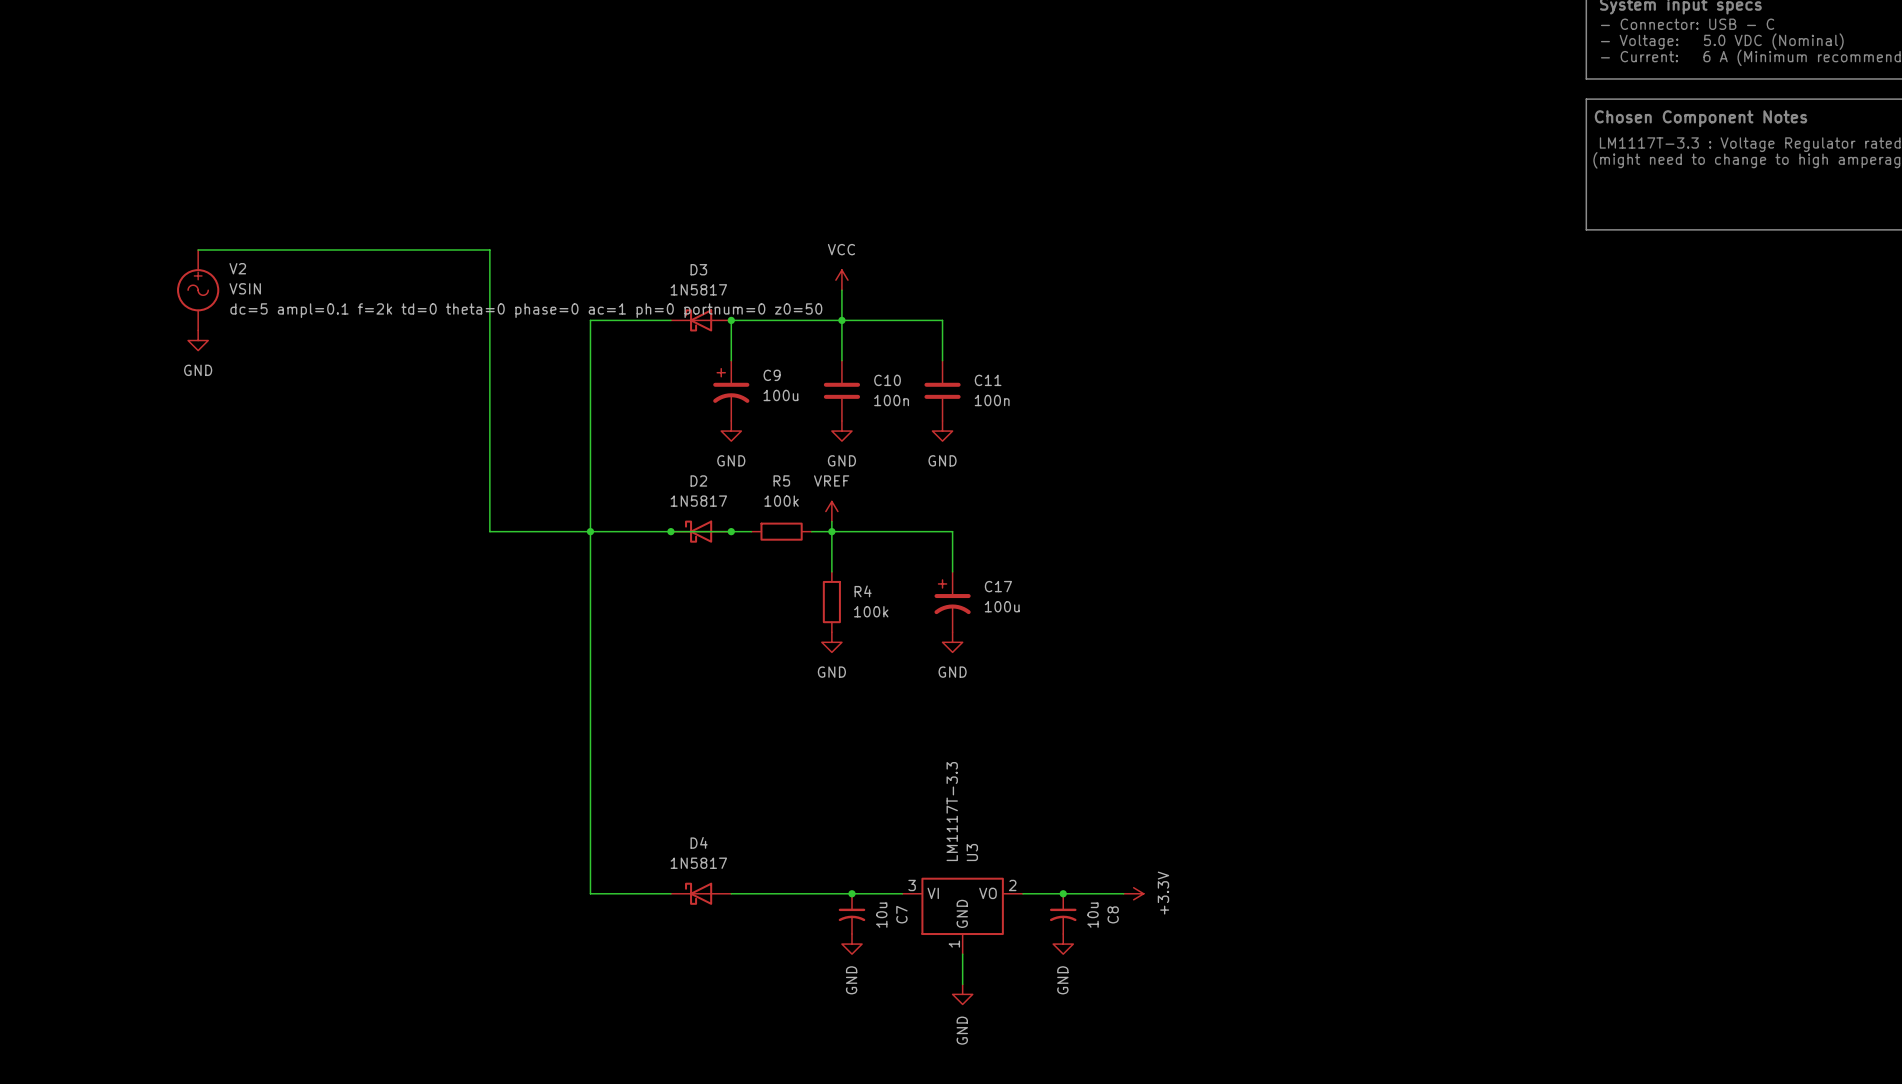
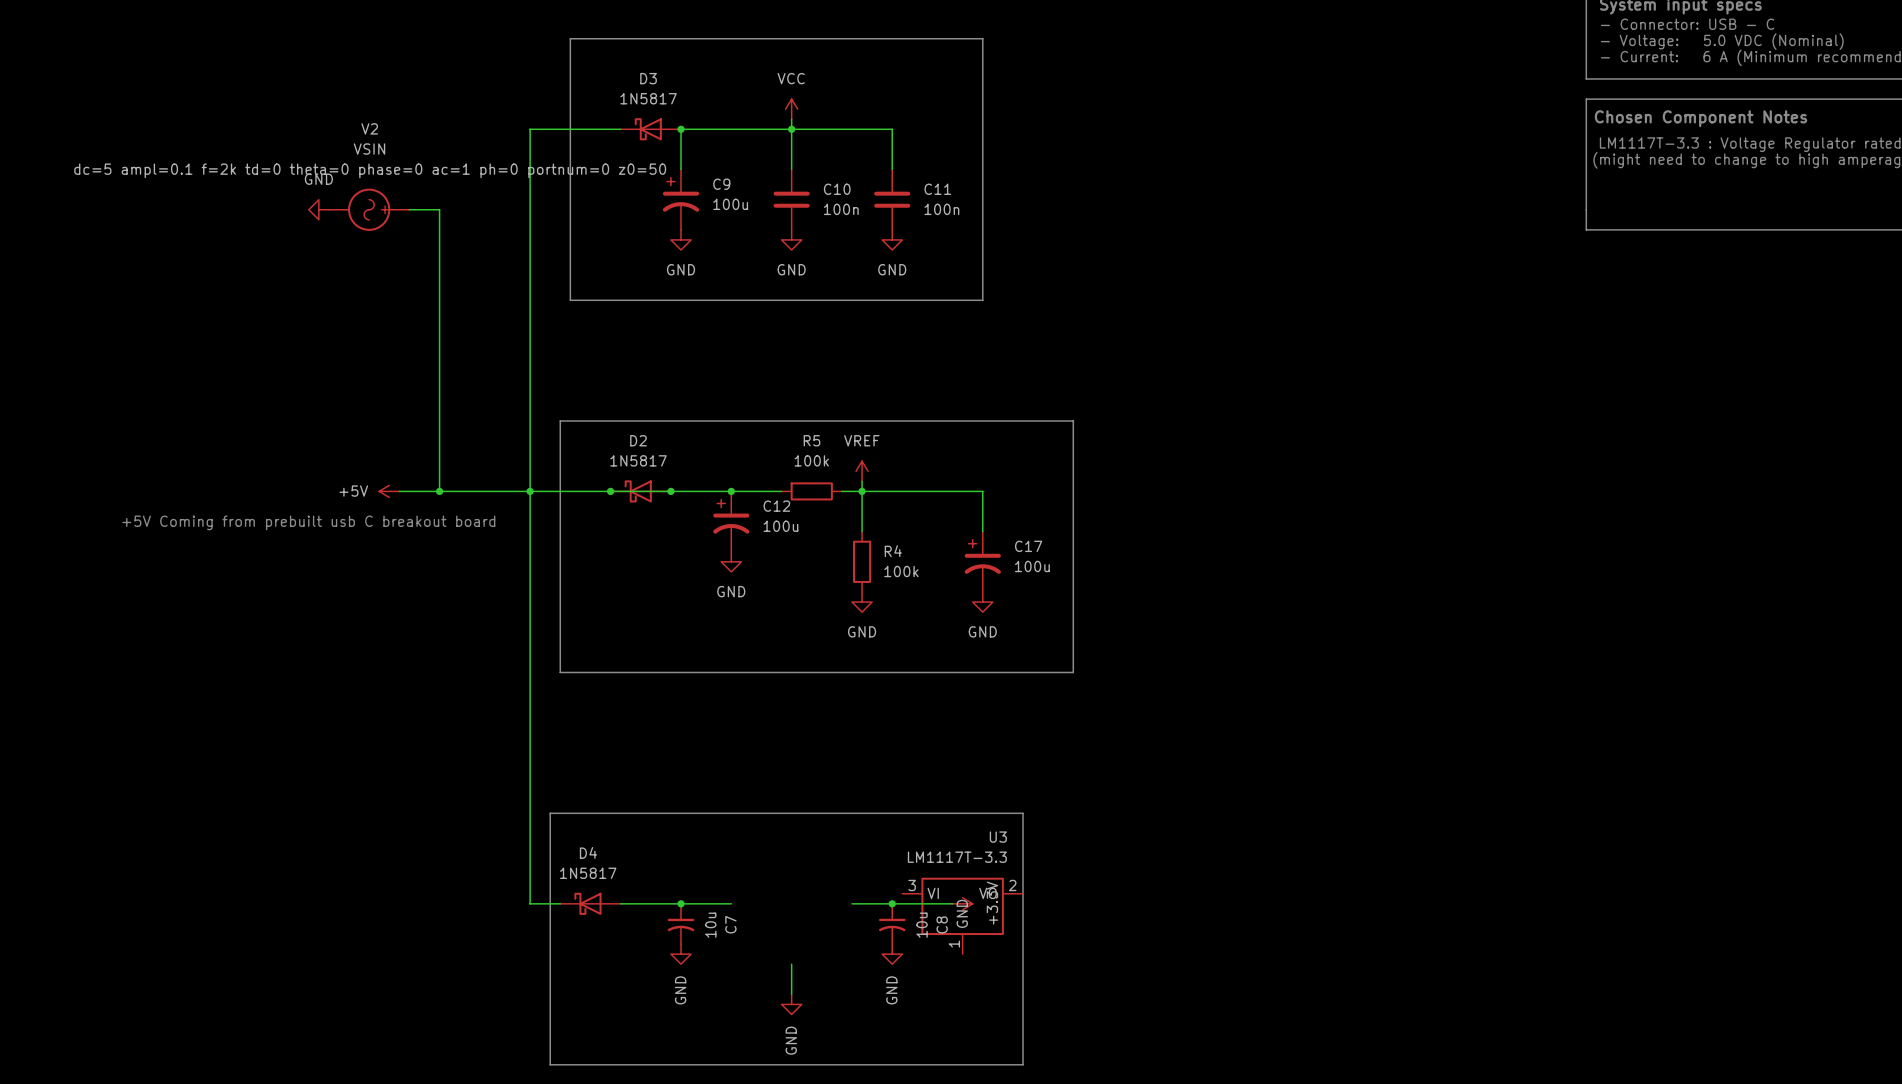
line: none -> (570, 38) (982, 38) (982, 300) (570, 300) (570, 38)
wire: none -> (791, 119) (791, 169)
wire: none -> (620, 129) (530, 129) (530, 903) (560, 903)
junction: none -> (680, 129)
junction: none -> (791, 129)
wire: none -> (409, 209) (439, 209) (439, 491)
power symbol: none -> GND (680, 239)
power symbol: none -> GND (791, 239)
power symbol: none -> GND (892, 239)
wire: (198, 250) (489, 250) (489, 531) (751, 531) -> none
V2 name position: V2 (237, 268) -> V2 (369, 128)
power symbol position: VCC (841, 280) -> VCC (791, 109)
V2 value position: VSIN (245, 288) -> VSIN (369, 149)
V2 rotation: 0° (198, 290) -> 90° clockwise (369, 209)
V2 position: (198, 290) -> (369, 209)
wire: (841, 290) (841, 360) -> none
V2 text position: dc=5 ampl=0.1 f=2k td=0 theta=0 phase=0 ac=1 ph=0 portnum=0 z0=50 (526, 310) -> dc=5 ampl=0.1 f=2k td=0 theta=0 phase=0 ac=1 ph=0 portnum=0 z0=50 (370, 170)
wire: (670, 320) (590, 320) (590, 893) (670, 893) -> none
D3 position: (701, 320) -> (650, 129)
junction: (731, 320) -> none
junction: (841, 320) -> none
power symbol rotation: 0° (198, 340) -> 90° clockwise (318, 209)
power symbol position: GND (198, 340) -> GND (318, 209)
wire: (731, 360) (731, 320) (942, 320) (942, 360) -> (680, 169) (680, 129) (892, 129) (892, 169)
power symbol text position: GND (198, 370) -> GND (318, 179)
C9 position: (731, 390) -> (680, 199)
C10 position: (841, 390) -> (791, 199)
C11 position: (942, 390) -> (892, 199)
line: none -> (560, 421) (1073, 421) (1073, 672) (560, 672) (560, 421)
power symbol: GND (731, 431) -> none
power symbol: GND (841, 431) -> none
power symbol: GND (942, 431) -> none
power symbol: none -> +5V (389, 491)
wire: none -> (399, 491) (781, 491)
junction: none -> (439, 491)
junction: none -> (530, 491)
junction: none -> (610, 491)
junction: none -> (670, 491)
junction: none -> (731, 491)
junction: none -> (862, 491)
power symbol position: VREF (831, 511) -> VREF (862, 471)
C12: none -> 100u (731, 521)
wire: (831, 521) (831, 571) -> (862, 481) (862, 531)
text: none -> +5V Coming from prebuilt usb C breakout board (308, 522)
junction: (590, 531) -> none
junction: (670, 531) -> none
D2 position: (701, 531) -> (640, 491)
junction: (731, 531) -> none
R5 position: (781, 531) -> (811, 491)
wire: (811, 531) (952, 531) (952, 571) -> (841, 491) (982, 491) (982, 531)
junction: (831, 531) -> none
power symbol: none -> GND (731, 561)
R4 position: (831, 602) -> (862, 561)
power symbol: none -> GND (862, 602)
C17 position: (952, 602) -> (982, 561)
power symbol: none -> GND (982, 602)
power symbol: GND (831, 642) -> none
power symbol: GND (952, 642) -> none
U3 value rotation: 0° (952, 811) -> 90° clockwise (957, 857)
line: none -> (550, 813) (1023, 813) (1023, 1064) (550, 1064) (550, 813)
U3 name rotation: 0° (972, 852) -> 90° clockwise (998, 837)
U3 name position: U3 (972, 852) -> U3 (998, 837)
D4 position: (701, 893) -> (590, 903)
wire: (731, 893) (902, 893) -> none
junction position: (852, 893) -> (892, 903)
wire: (1023, 893) (1123, 893) -> (852, 903) (952, 903)
junction: (1063, 893) -> none
power symbol position: +3.3V (1133, 893) -> +3.3V (962, 903)
wire: none -> (620, 903) (731, 903)
junction: none -> (680, 903)
C7 position: (852, 913) -> (680, 923)
C8 position: (1063, 913) -> (892, 923)
power symbol: GND (852, 944) -> none
power symbol: GND (1063, 944) -> none
power symbol: none -> GND (680, 954)
power symbol: none -> GND (892, 954)
wire: (962, 954) (962, 984) -> (791, 964) (791, 994)
power symbol: GND (962, 994) -> none
power symbol: none -> GND (791, 1004)

